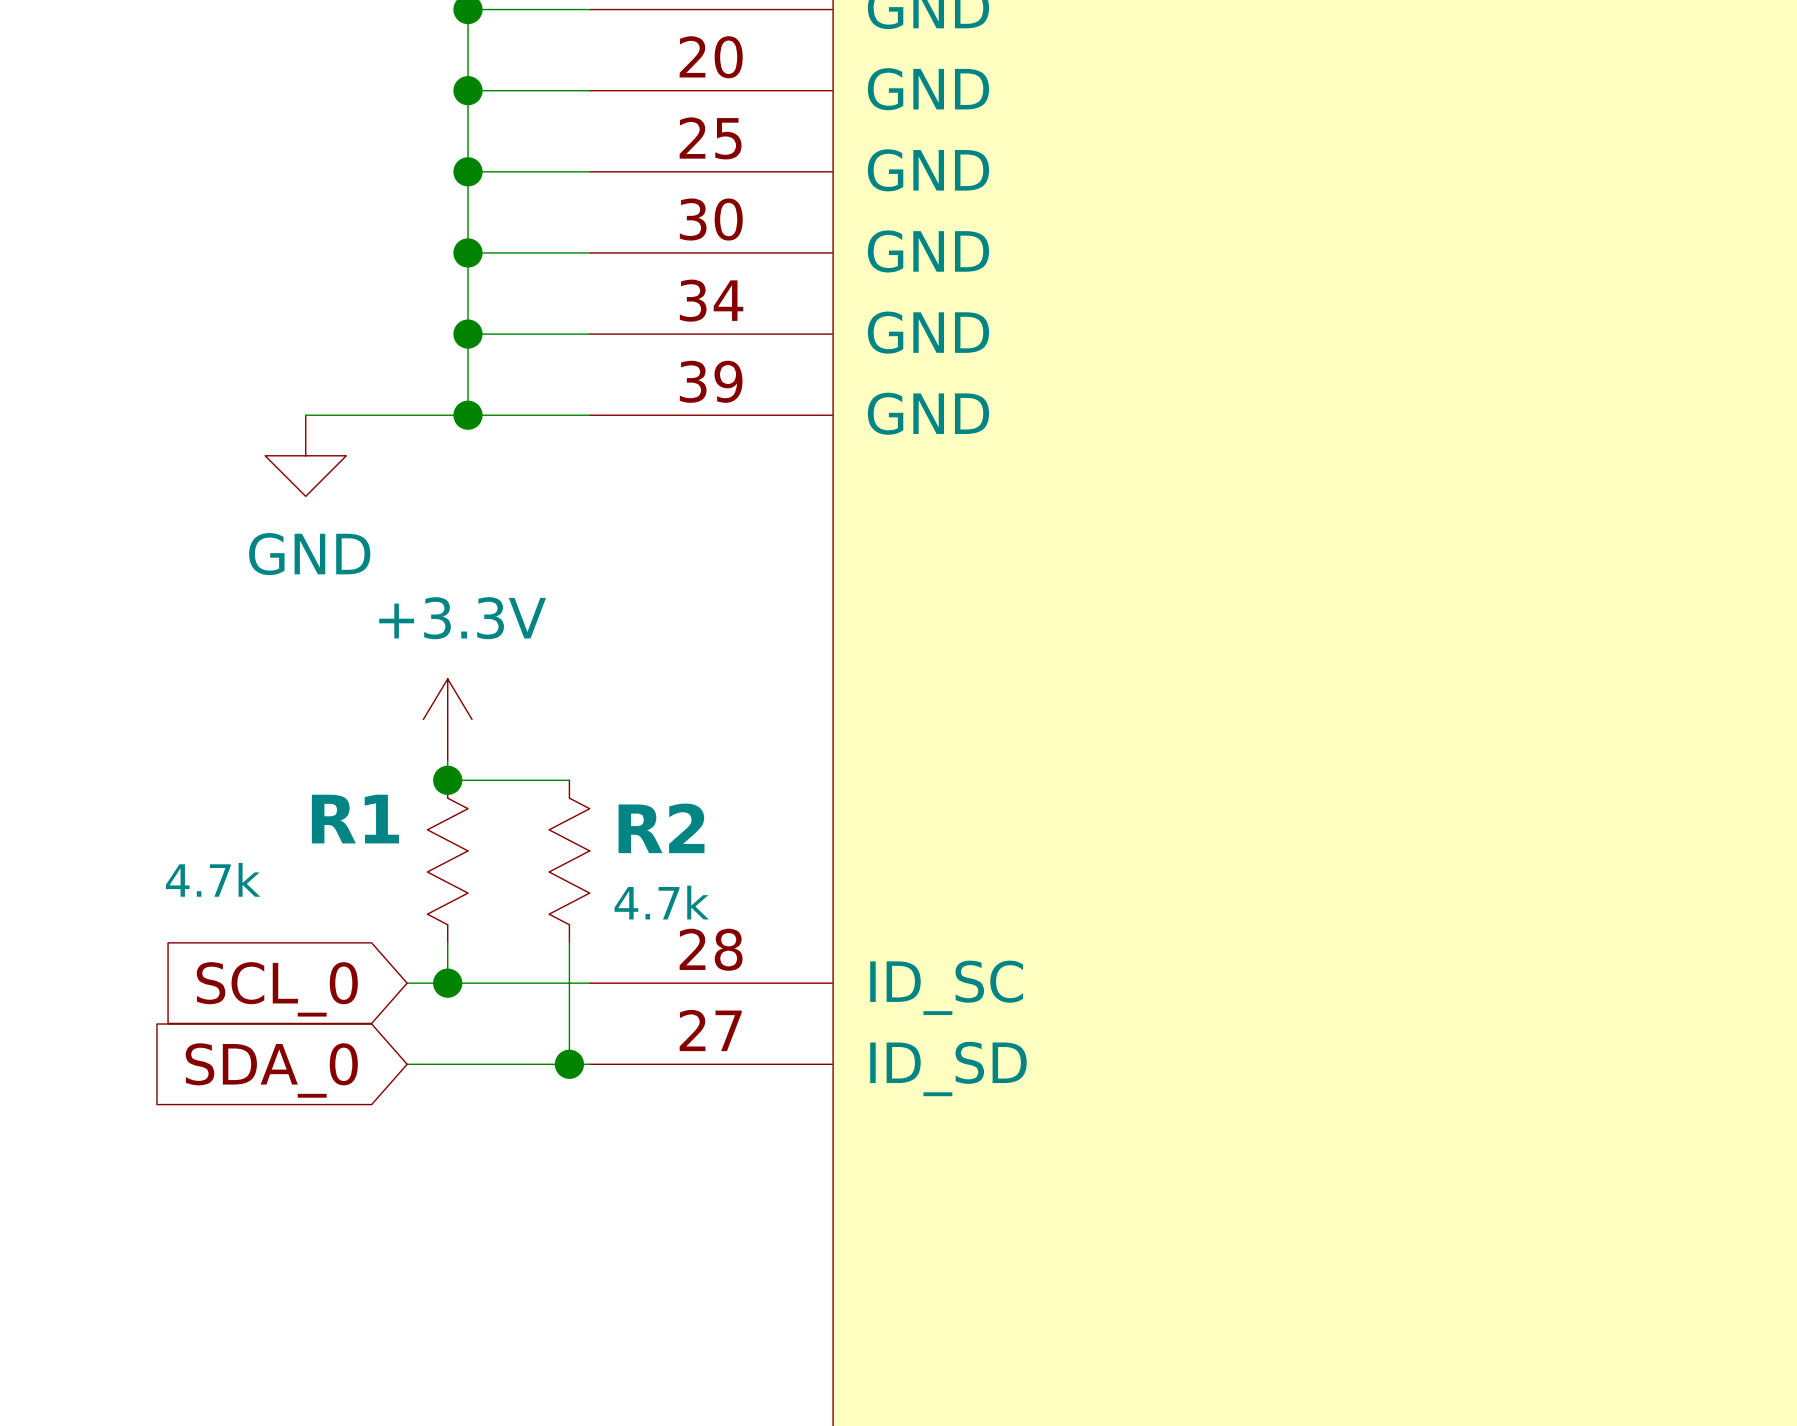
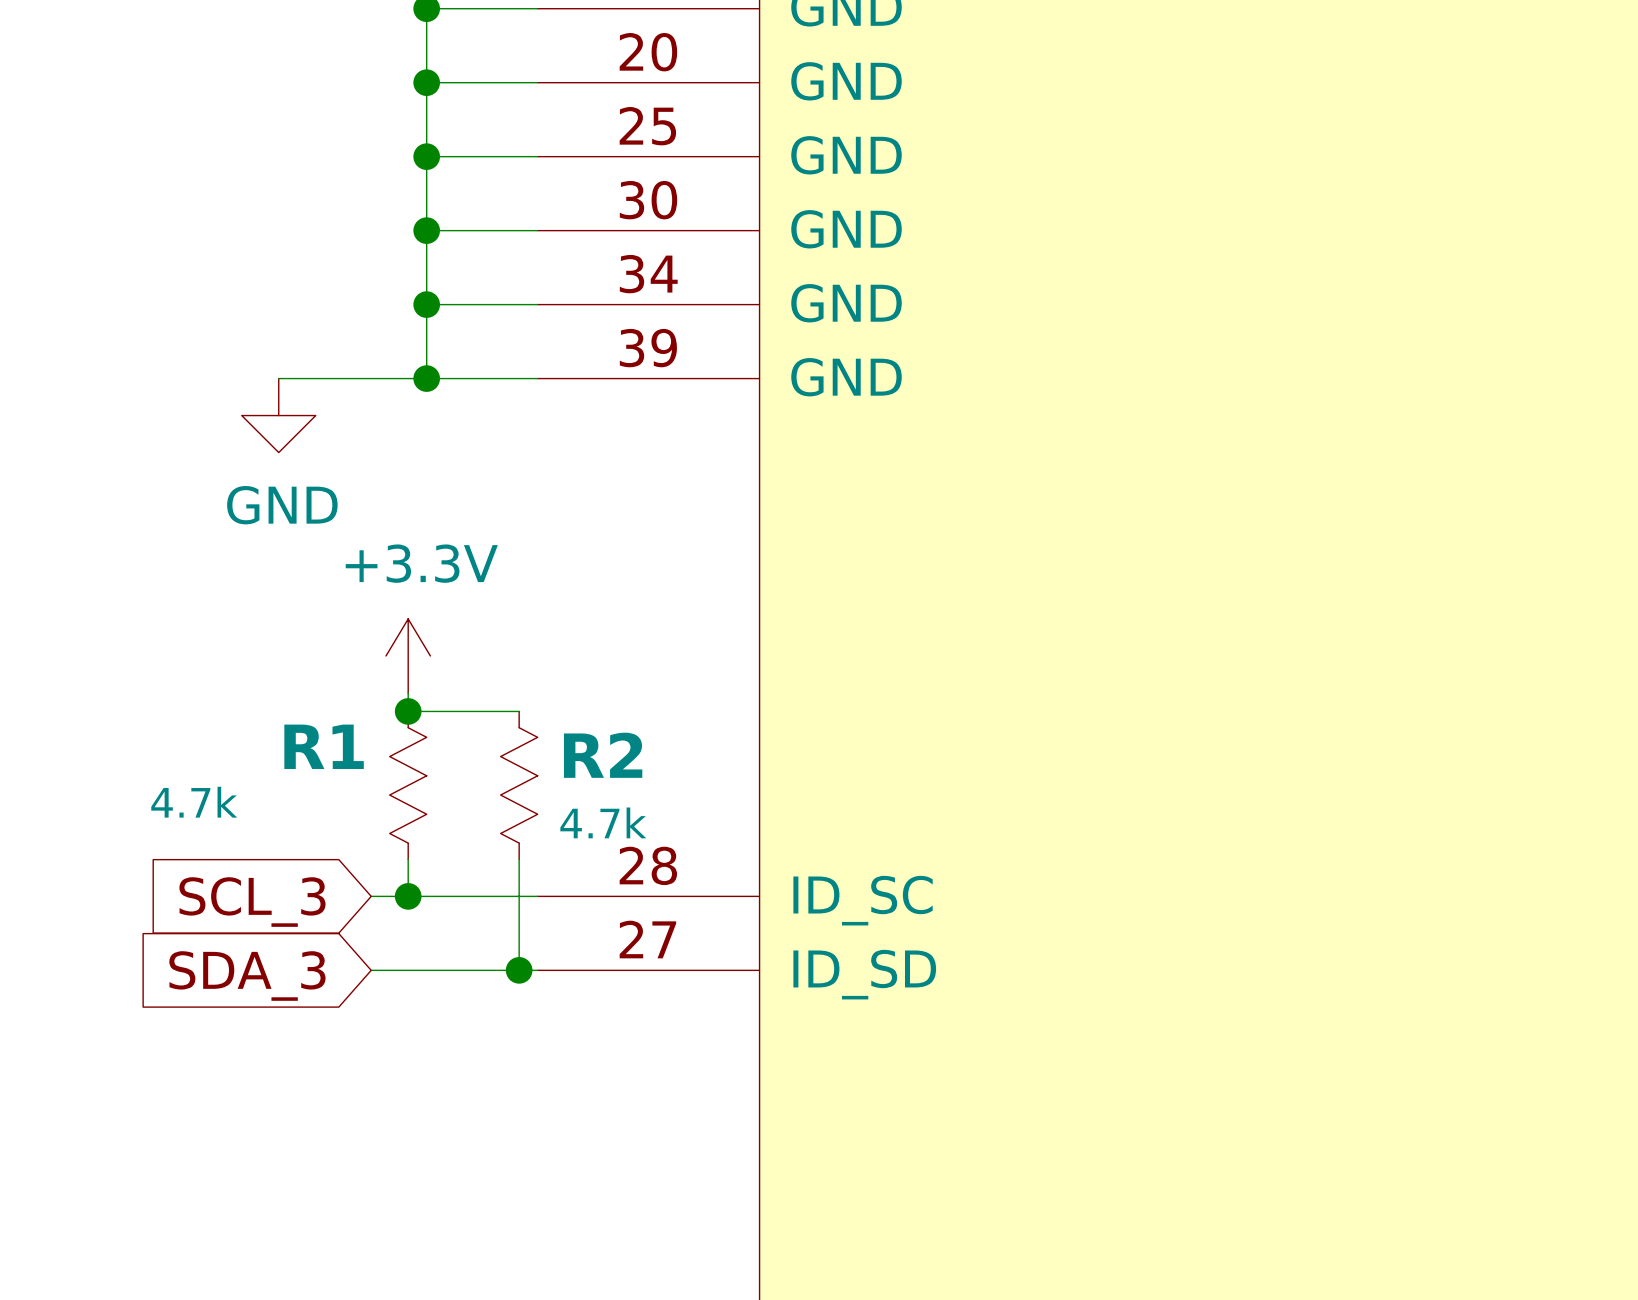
global label: SCL_0 (277, 989) -> SCL_3 (252, 902)
global label: SDA_0 (271, 1070) -> SDA_3 (247, 976)

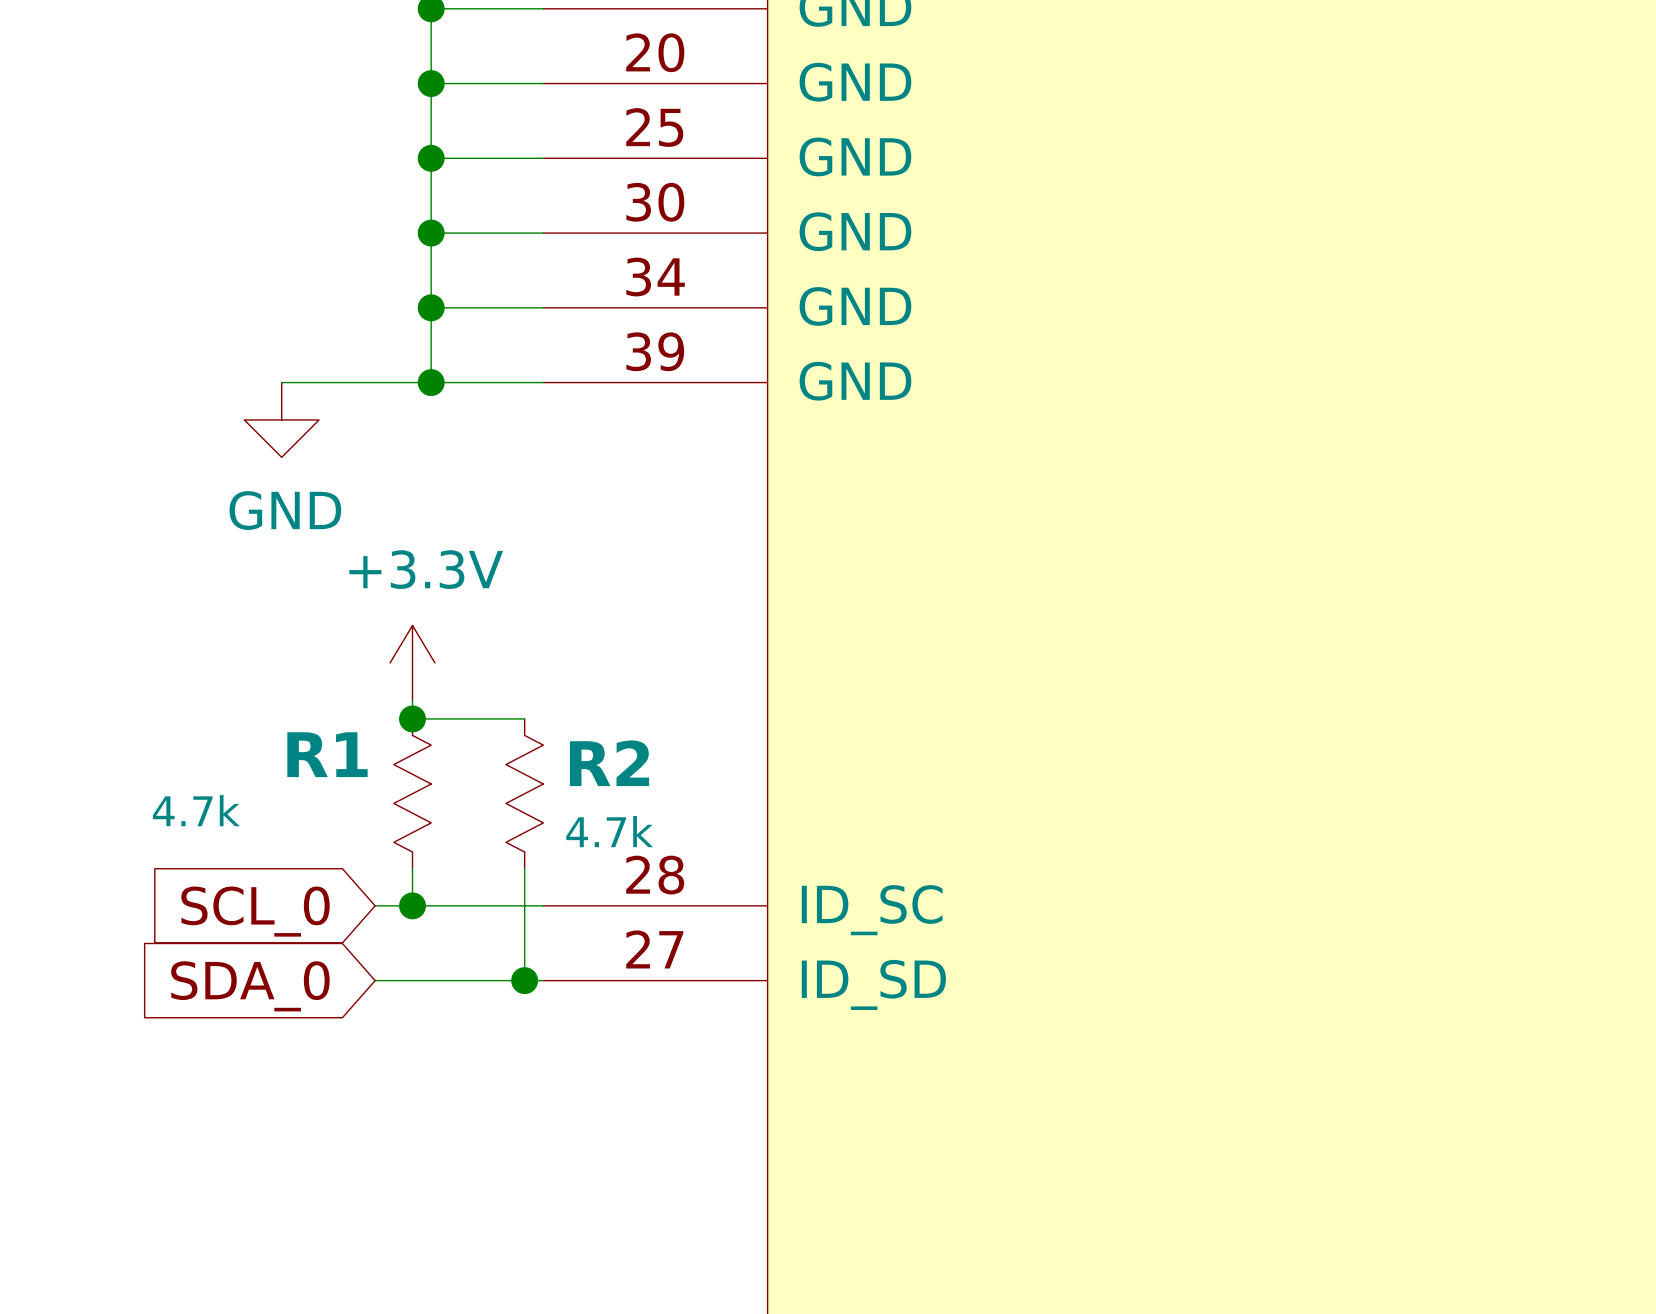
global label: SCL_3 (252, 902) -> SCL_0 (255, 911)
global label: SDA_3 (247, 976) -> SDA_0 (250, 986)

